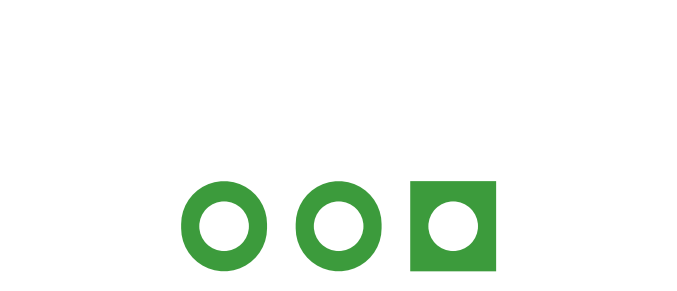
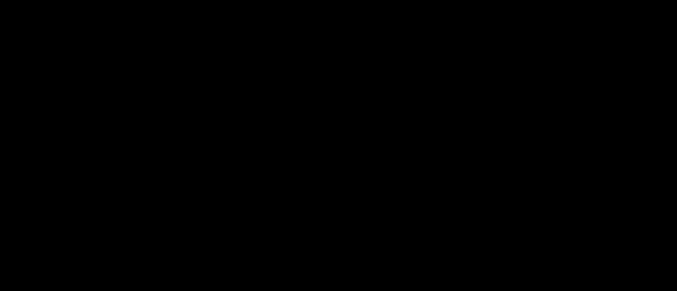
part: (338, 226) -> none

